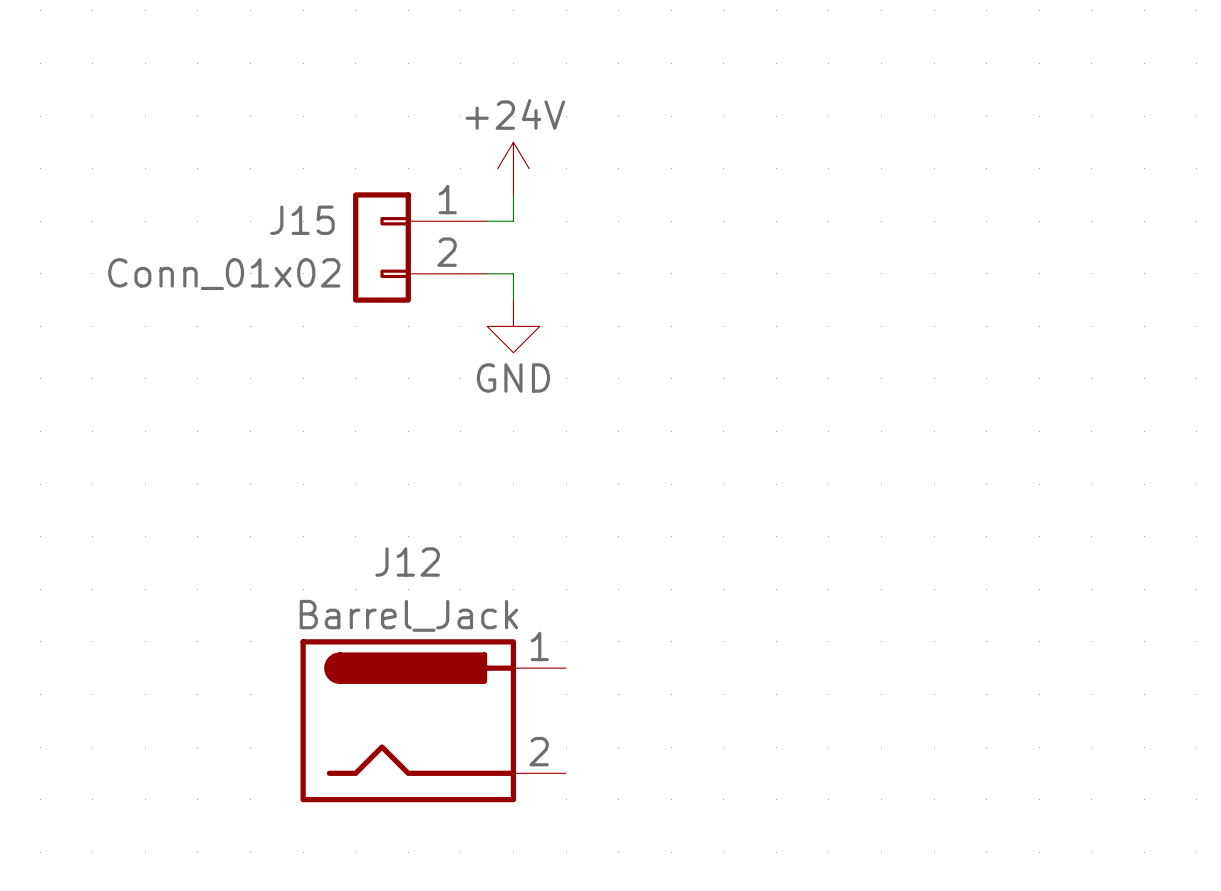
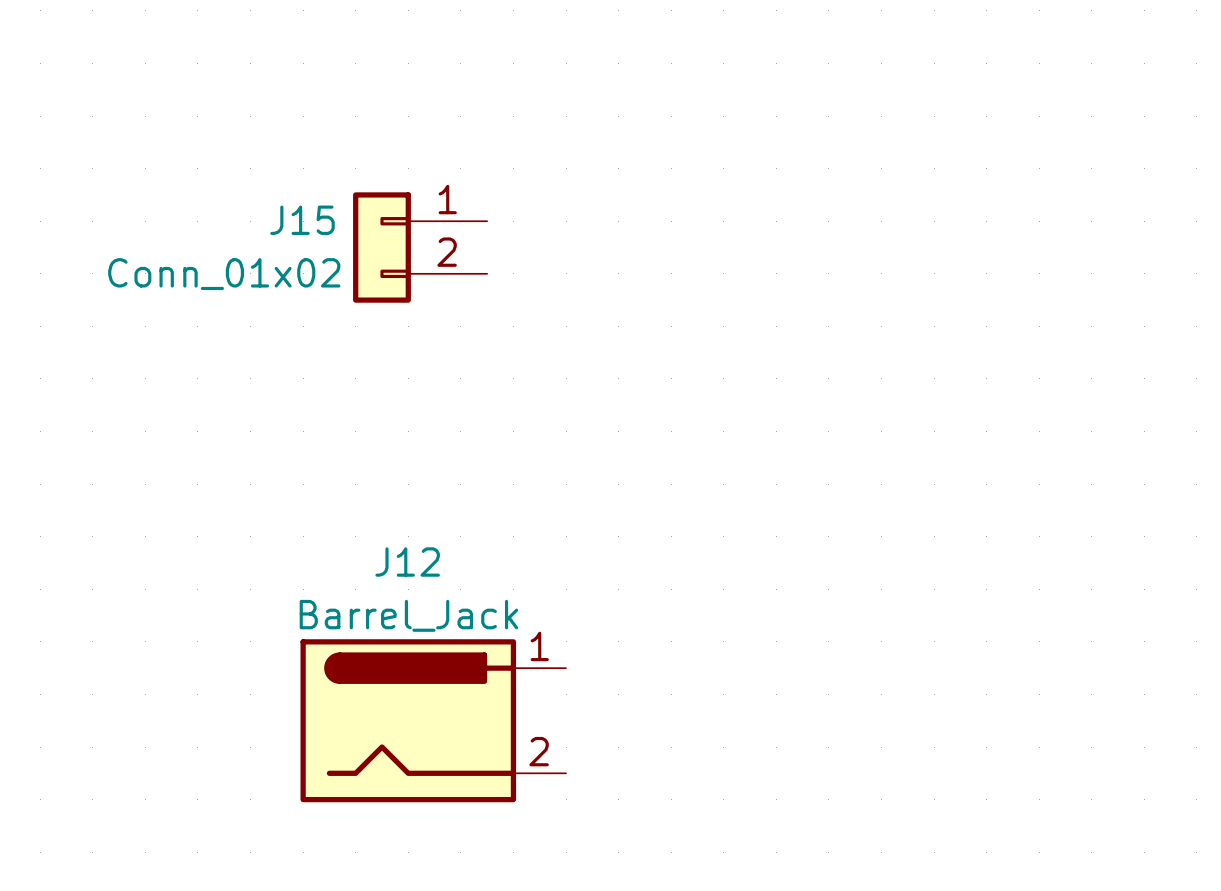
power symbol: +24V (513, 168) -> none
wire: (513, 194) (513, 221) (487, 221) -> none
wire: (487, 273) (513, 273) (513, 300) -> none
power symbol: GND (513, 326) -> none

